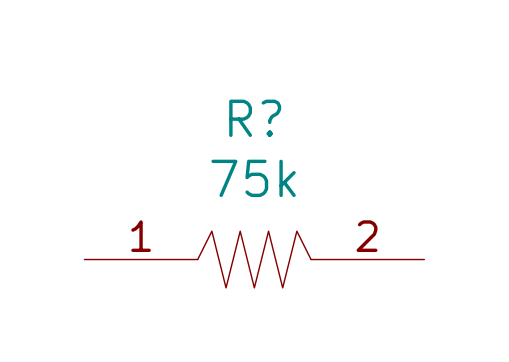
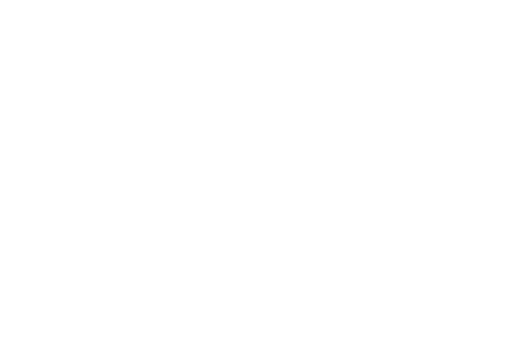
R?: (254, 259) -> none

